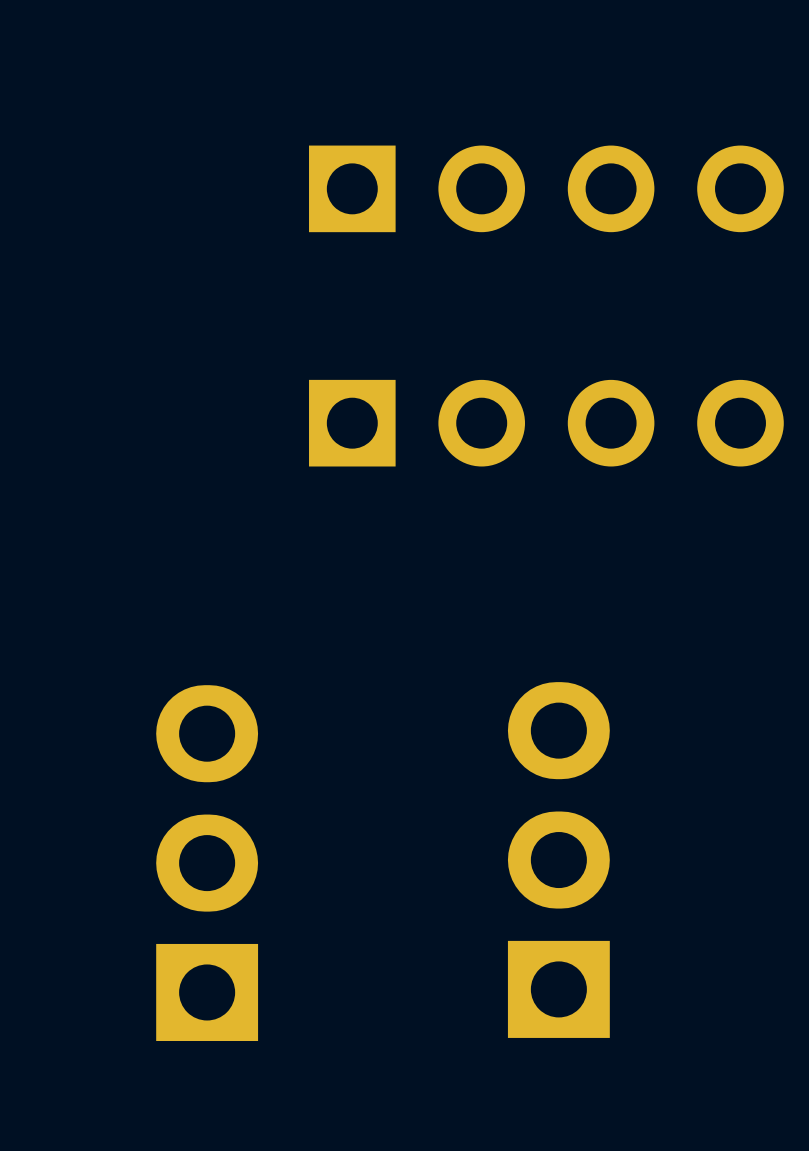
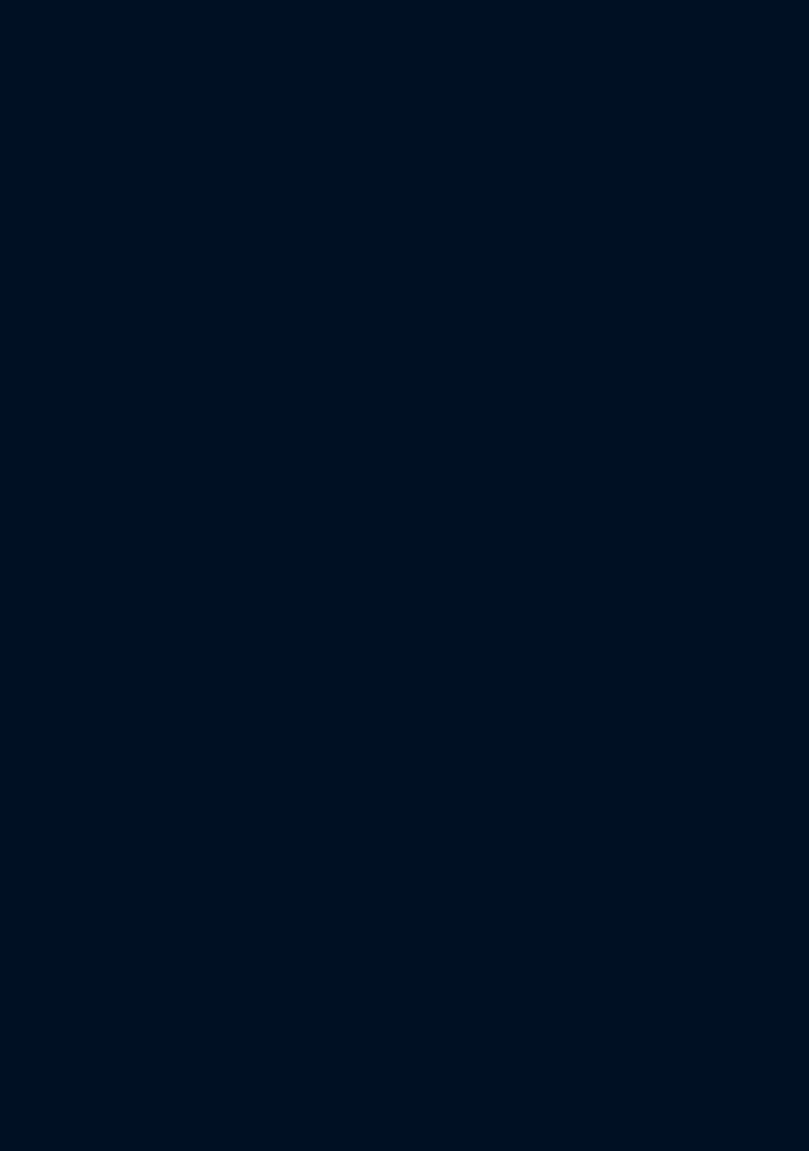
part: (546, 188) -> none
part: (546, 423) -> none
part: (558, 860) -> none
part: (207, 863) -> none

